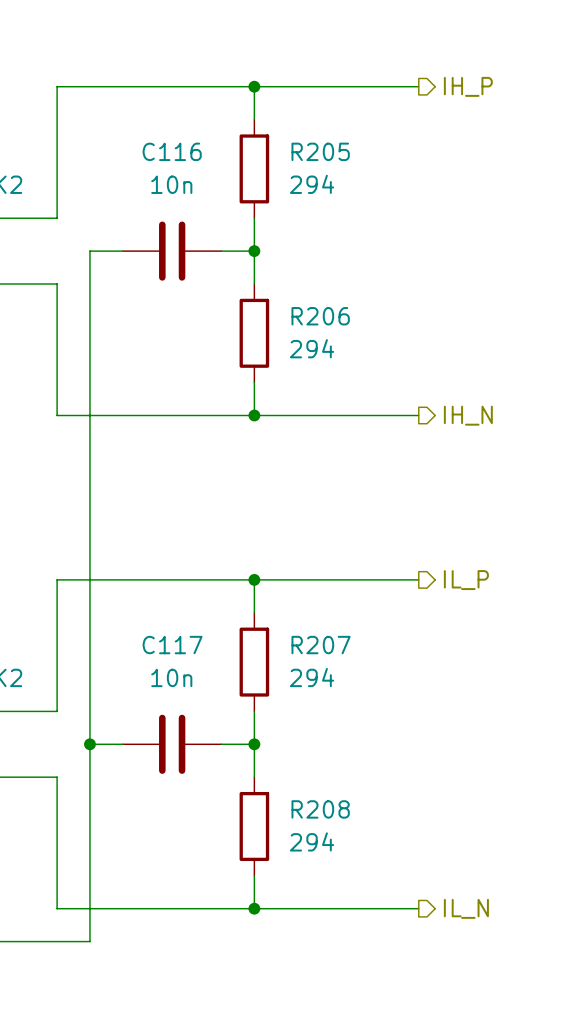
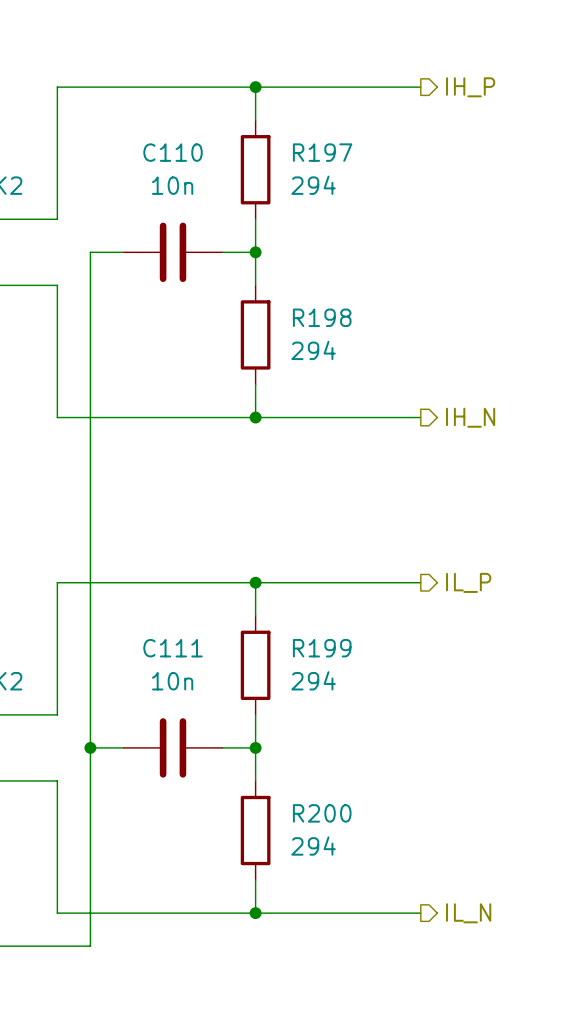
C116 name: C116 (172, 151) -> C110 (173, 152)
R205 name: R205 (320, 151) -> R197 (322, 152)
R206 name: R206 (320, 316) -> R198 (322, 317)
C117 name: C117 (172, 645) -> C111 (173, 648)
R207 name: R207 (321, 645) -> R199 (322, 648)
R208 name: R208 (320, 809) -> R200 (322, 813)

